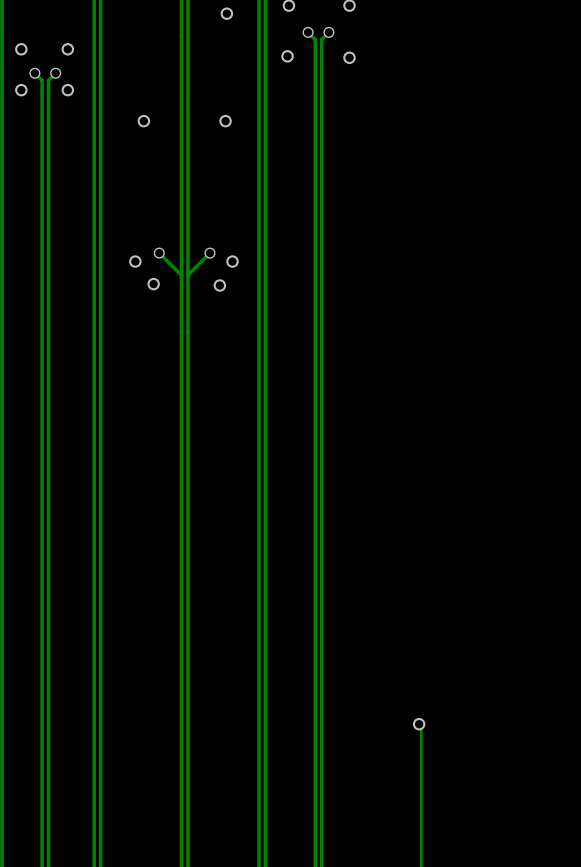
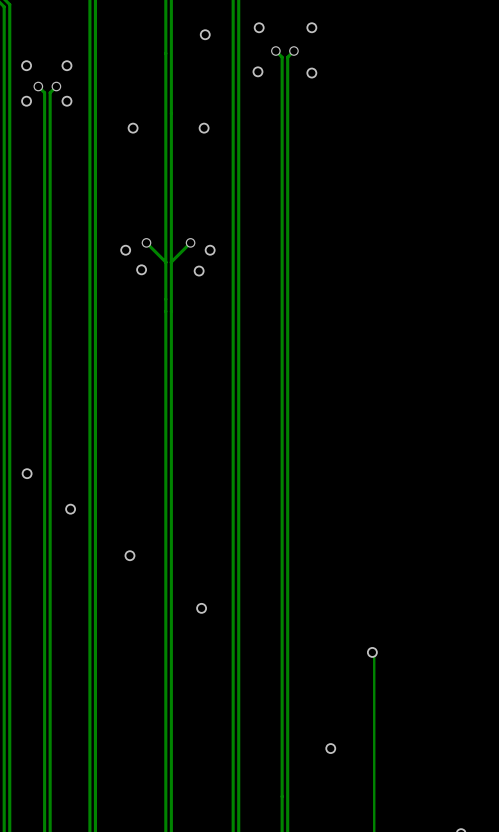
via: none -> (27, 473)
via: none -> (70, 509)
via: none -> (129, 555)
via: none -> (201, 608)
via: none -> (330, 748)

